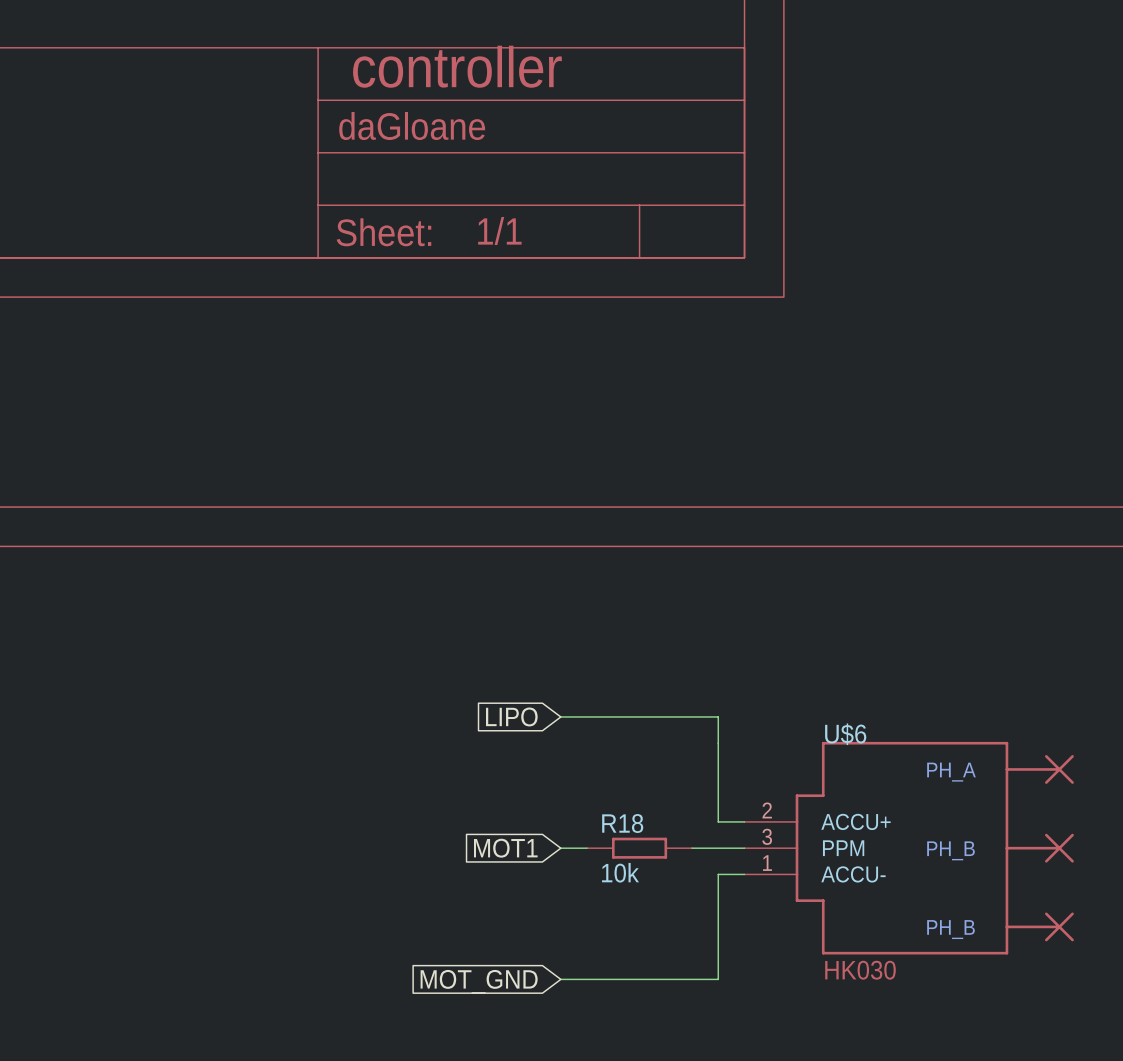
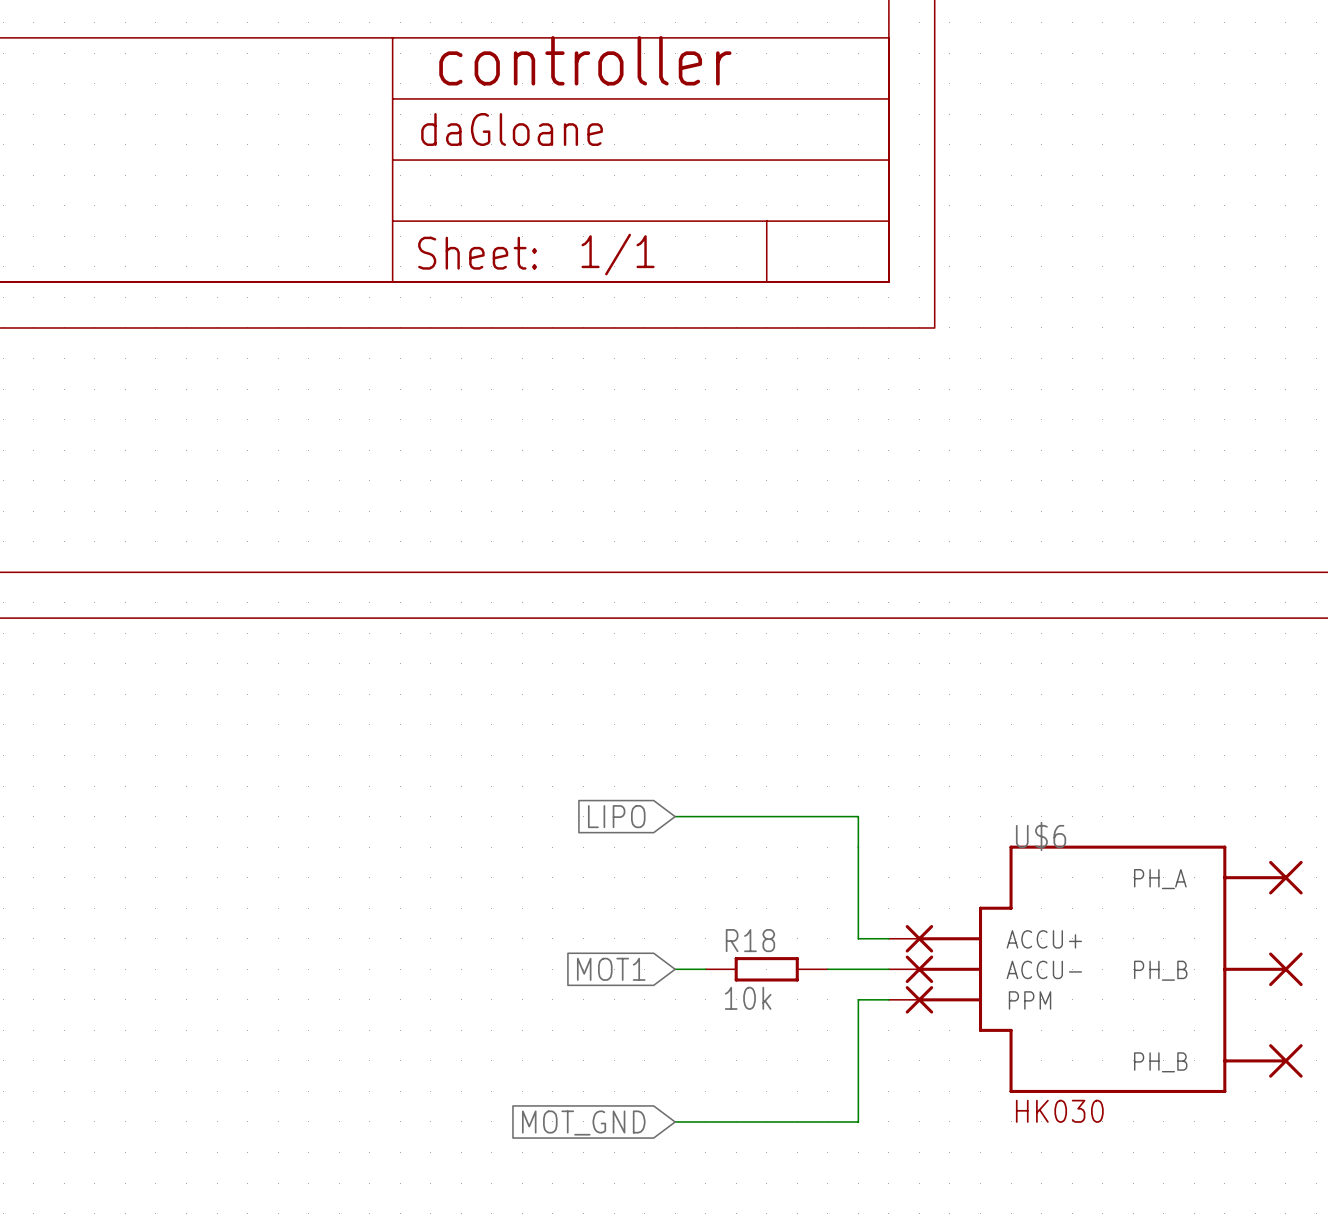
U$6 symbol: [744, 741, 1074, 955] -> [917, 845, 1303, 1093]
part: none -> (911, 938)
part: none -> (911, 969)
part: none -> (911, 999)

